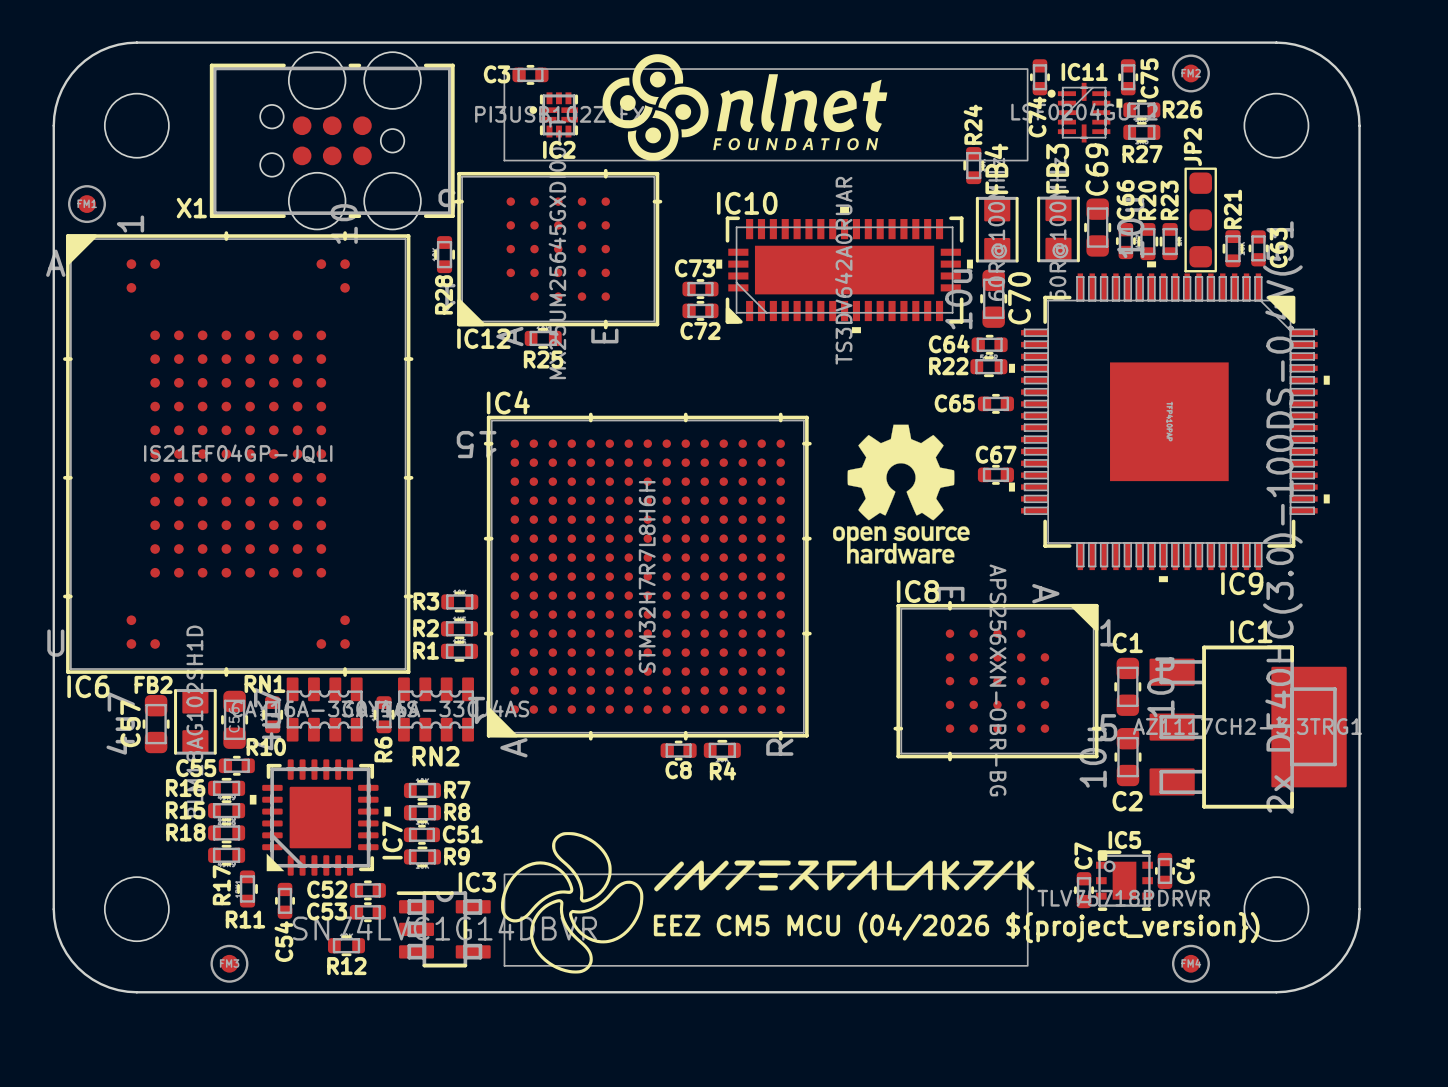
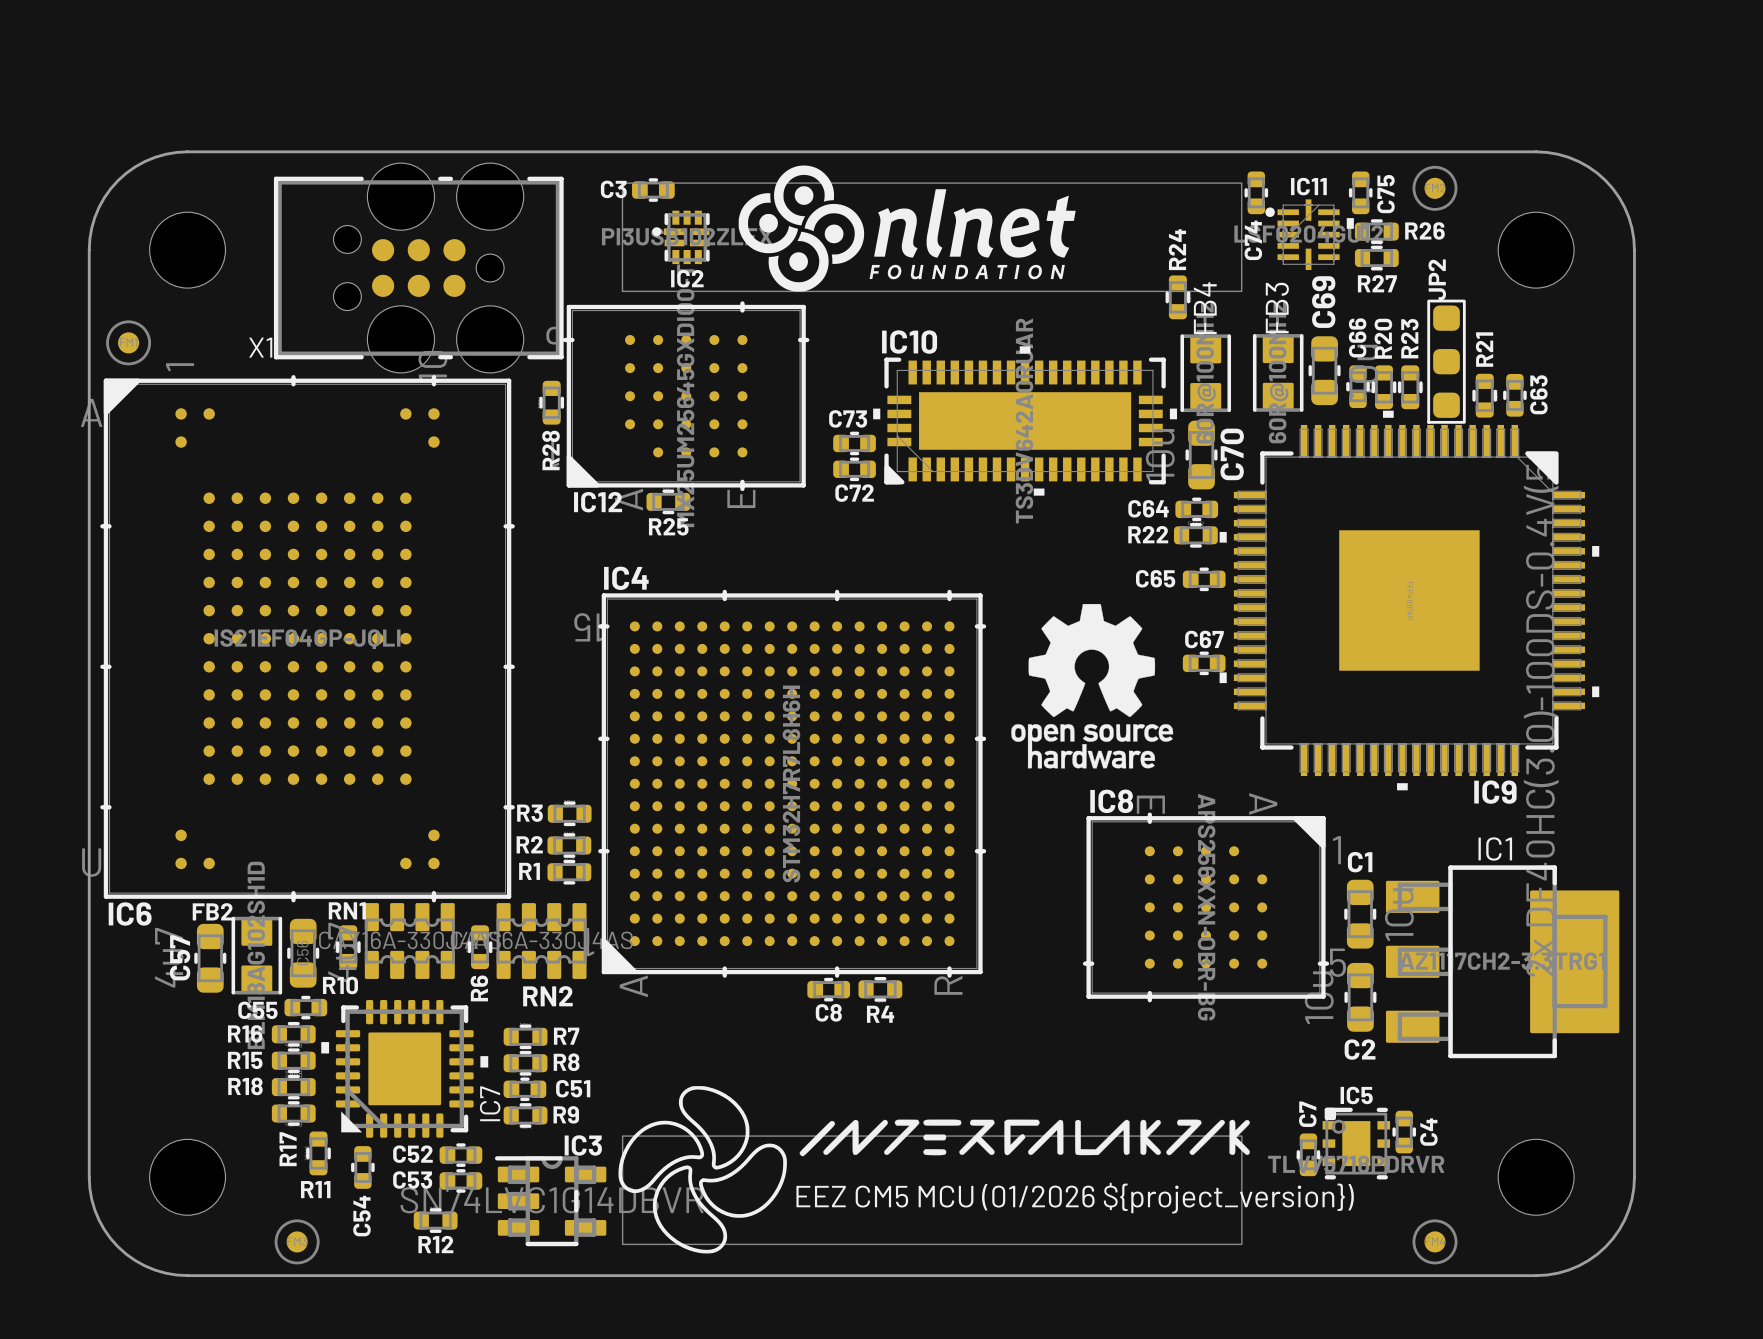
text: EEZ CM5 MCU (04/2026 ${project_version}) (956, 927) -> EEZ CM5 MCU (01/2026 ${project_version}) (1075, 1198)

